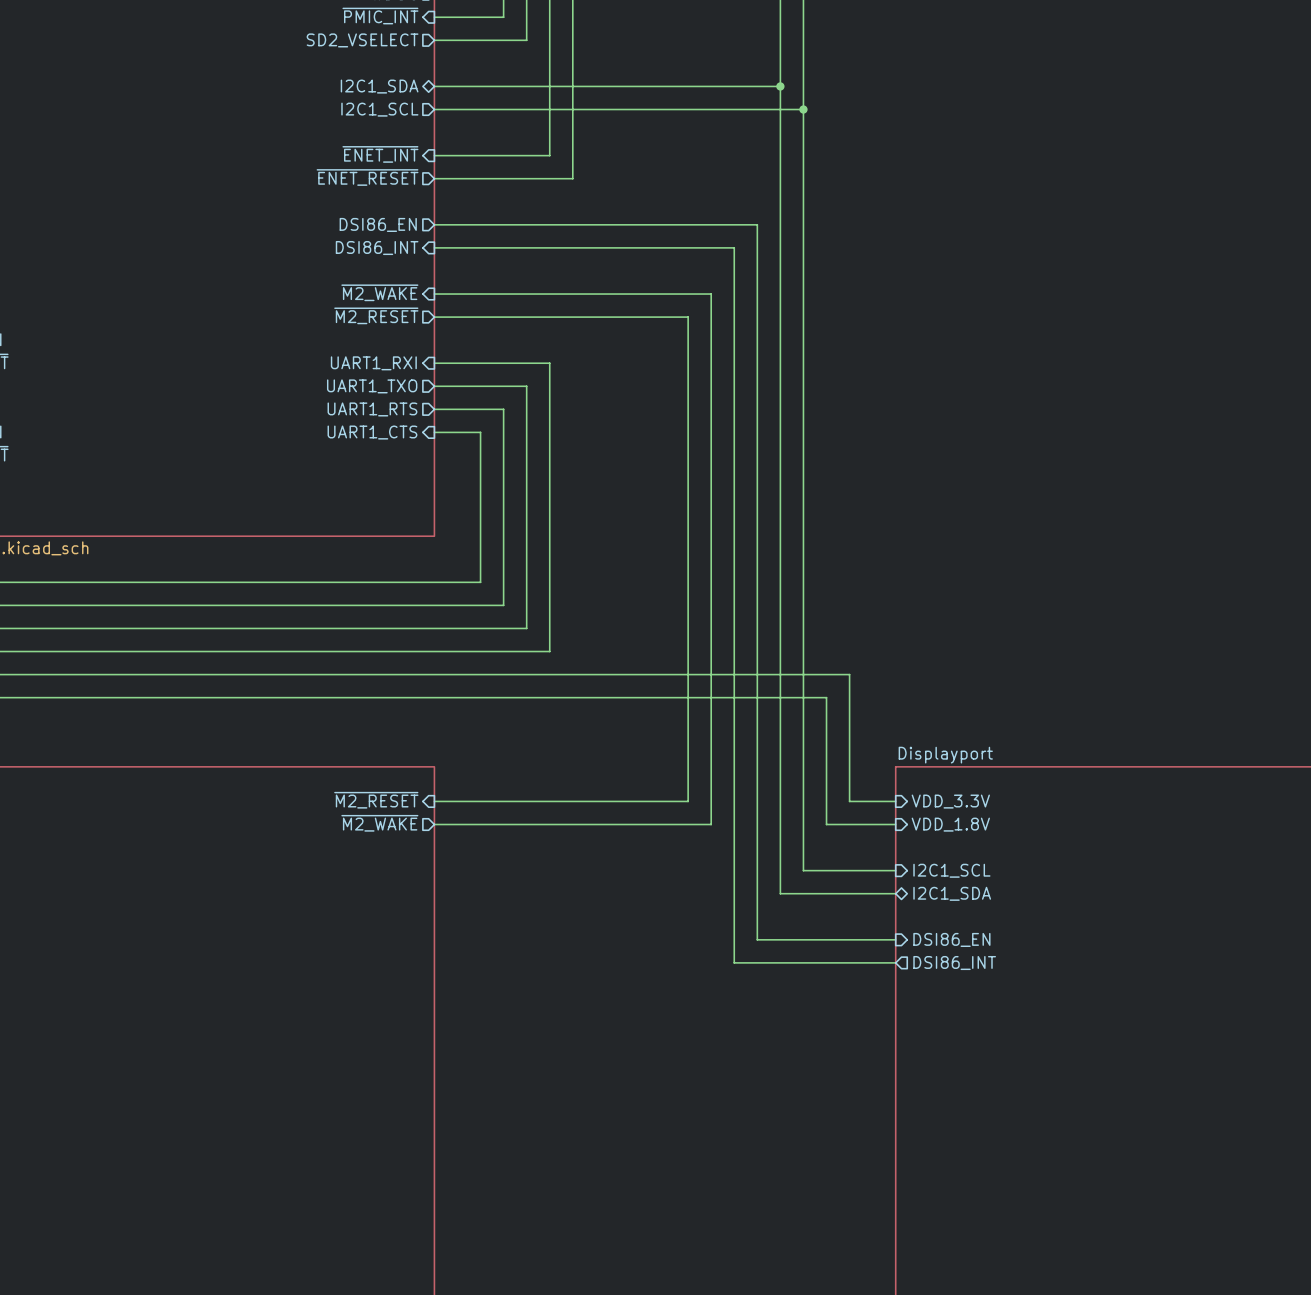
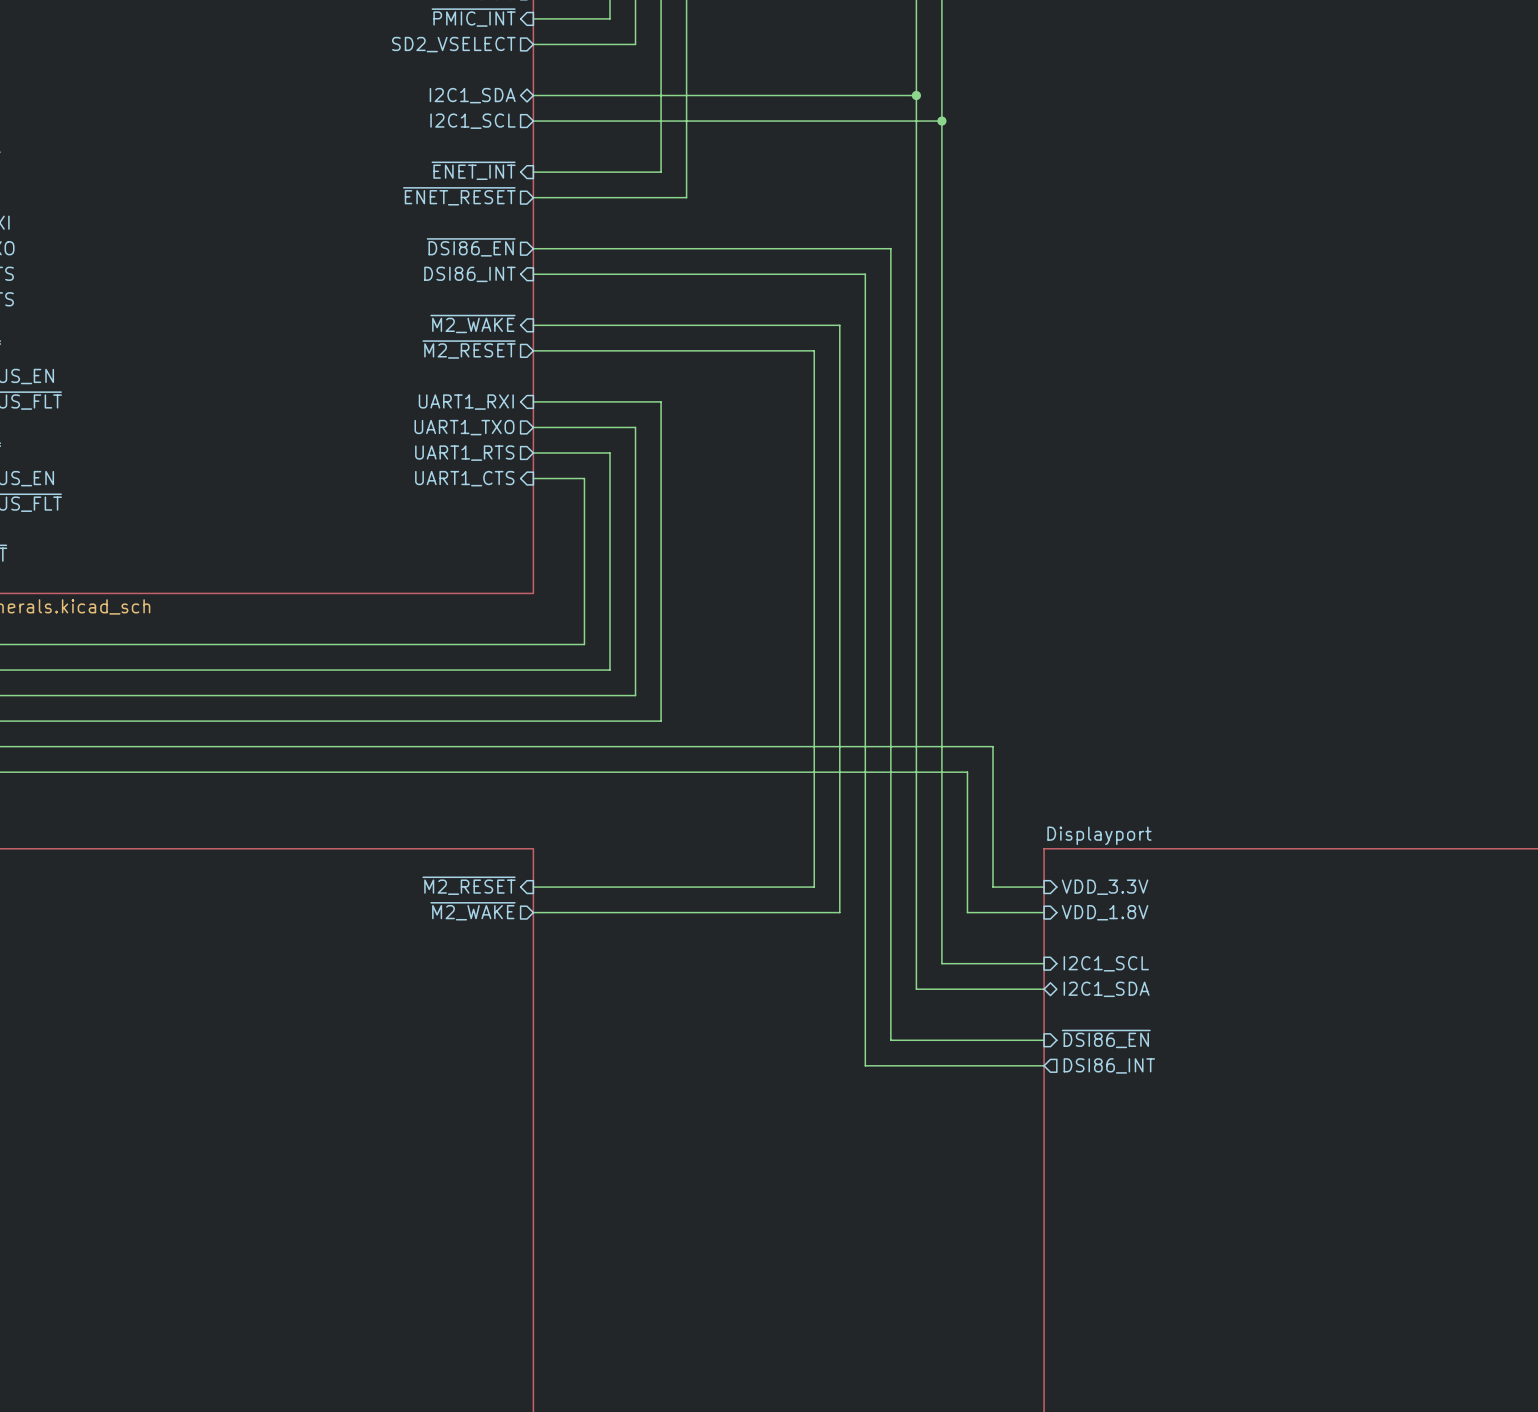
sheet pin: DSI86_EN (378, 224) -> ~{DSI86_EN} (471, 247)
sheet pin: DSI86_EN (951, 939) -> ~{DSI86_EN} (1106, 1038)

